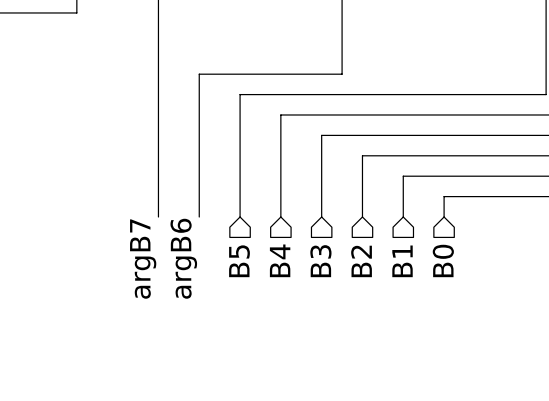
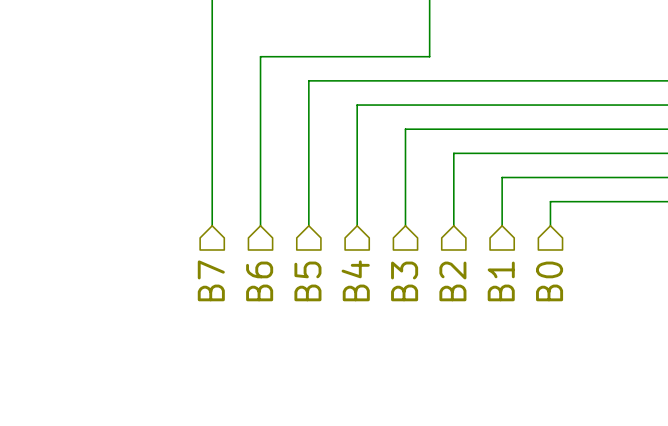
label: argB6 (183, 258) -> none
label: argB7 (143, 259) -> none
hierarchical label: none -> B6 (259, 281)
hierarchical label: none -> B7 (211, 280)

